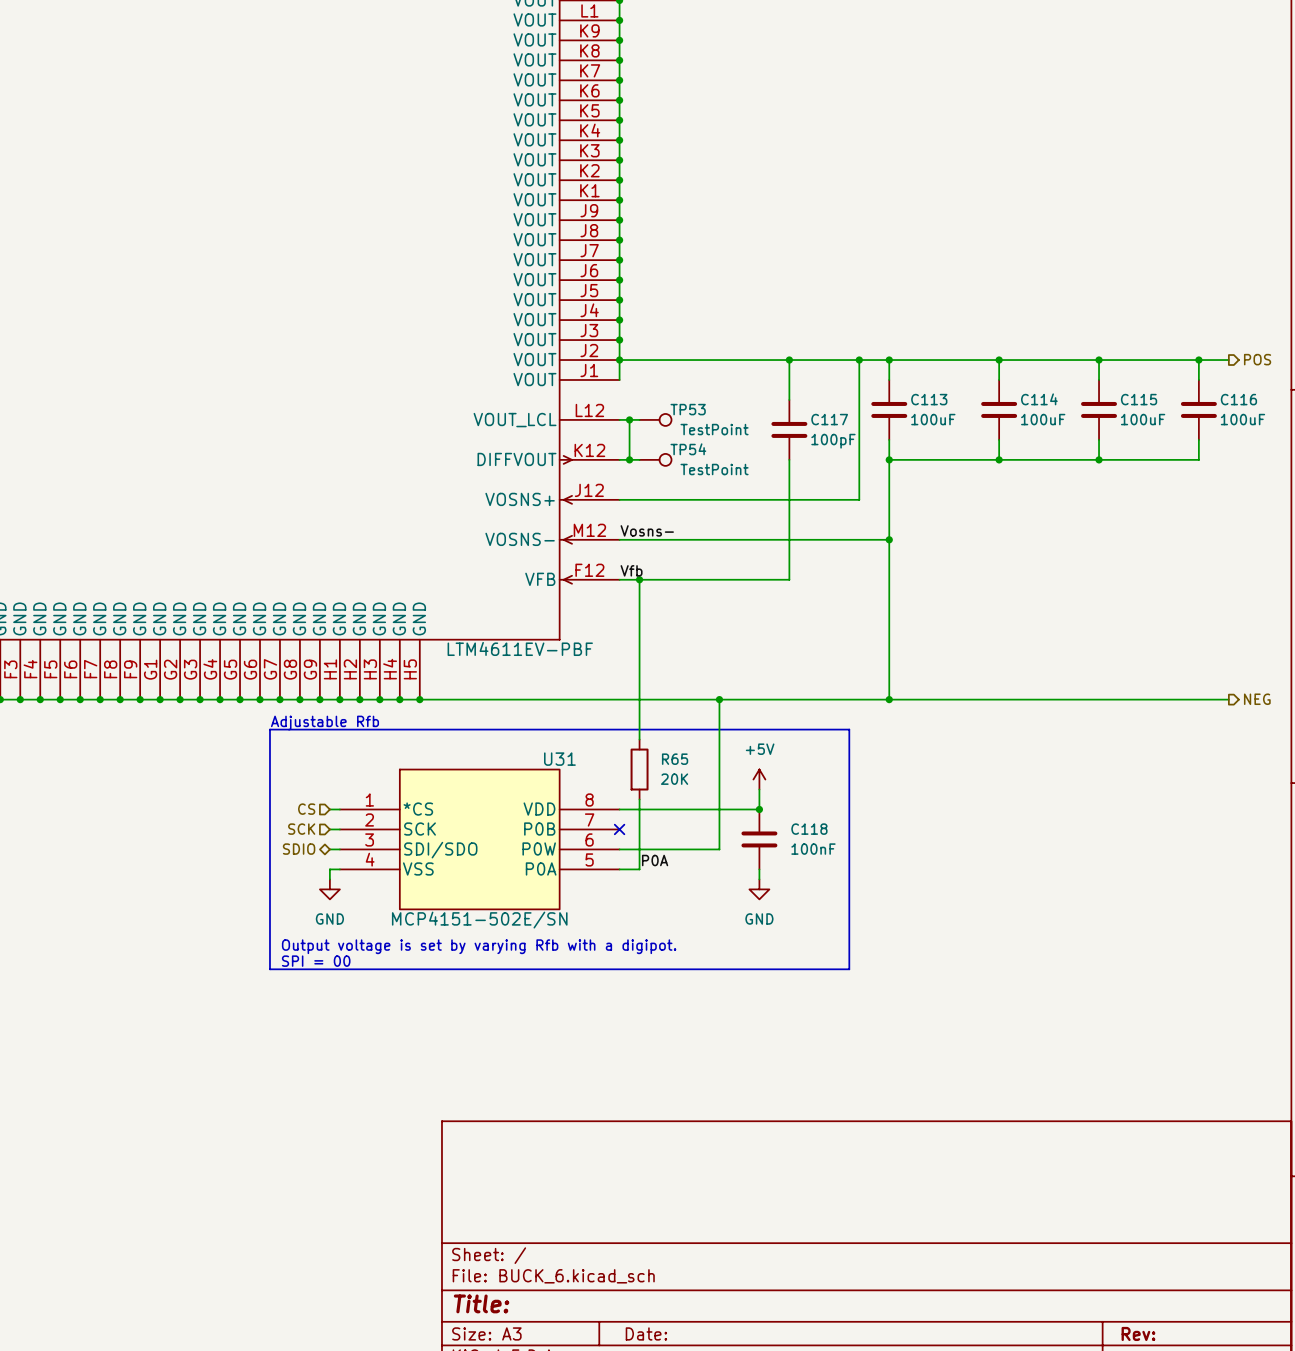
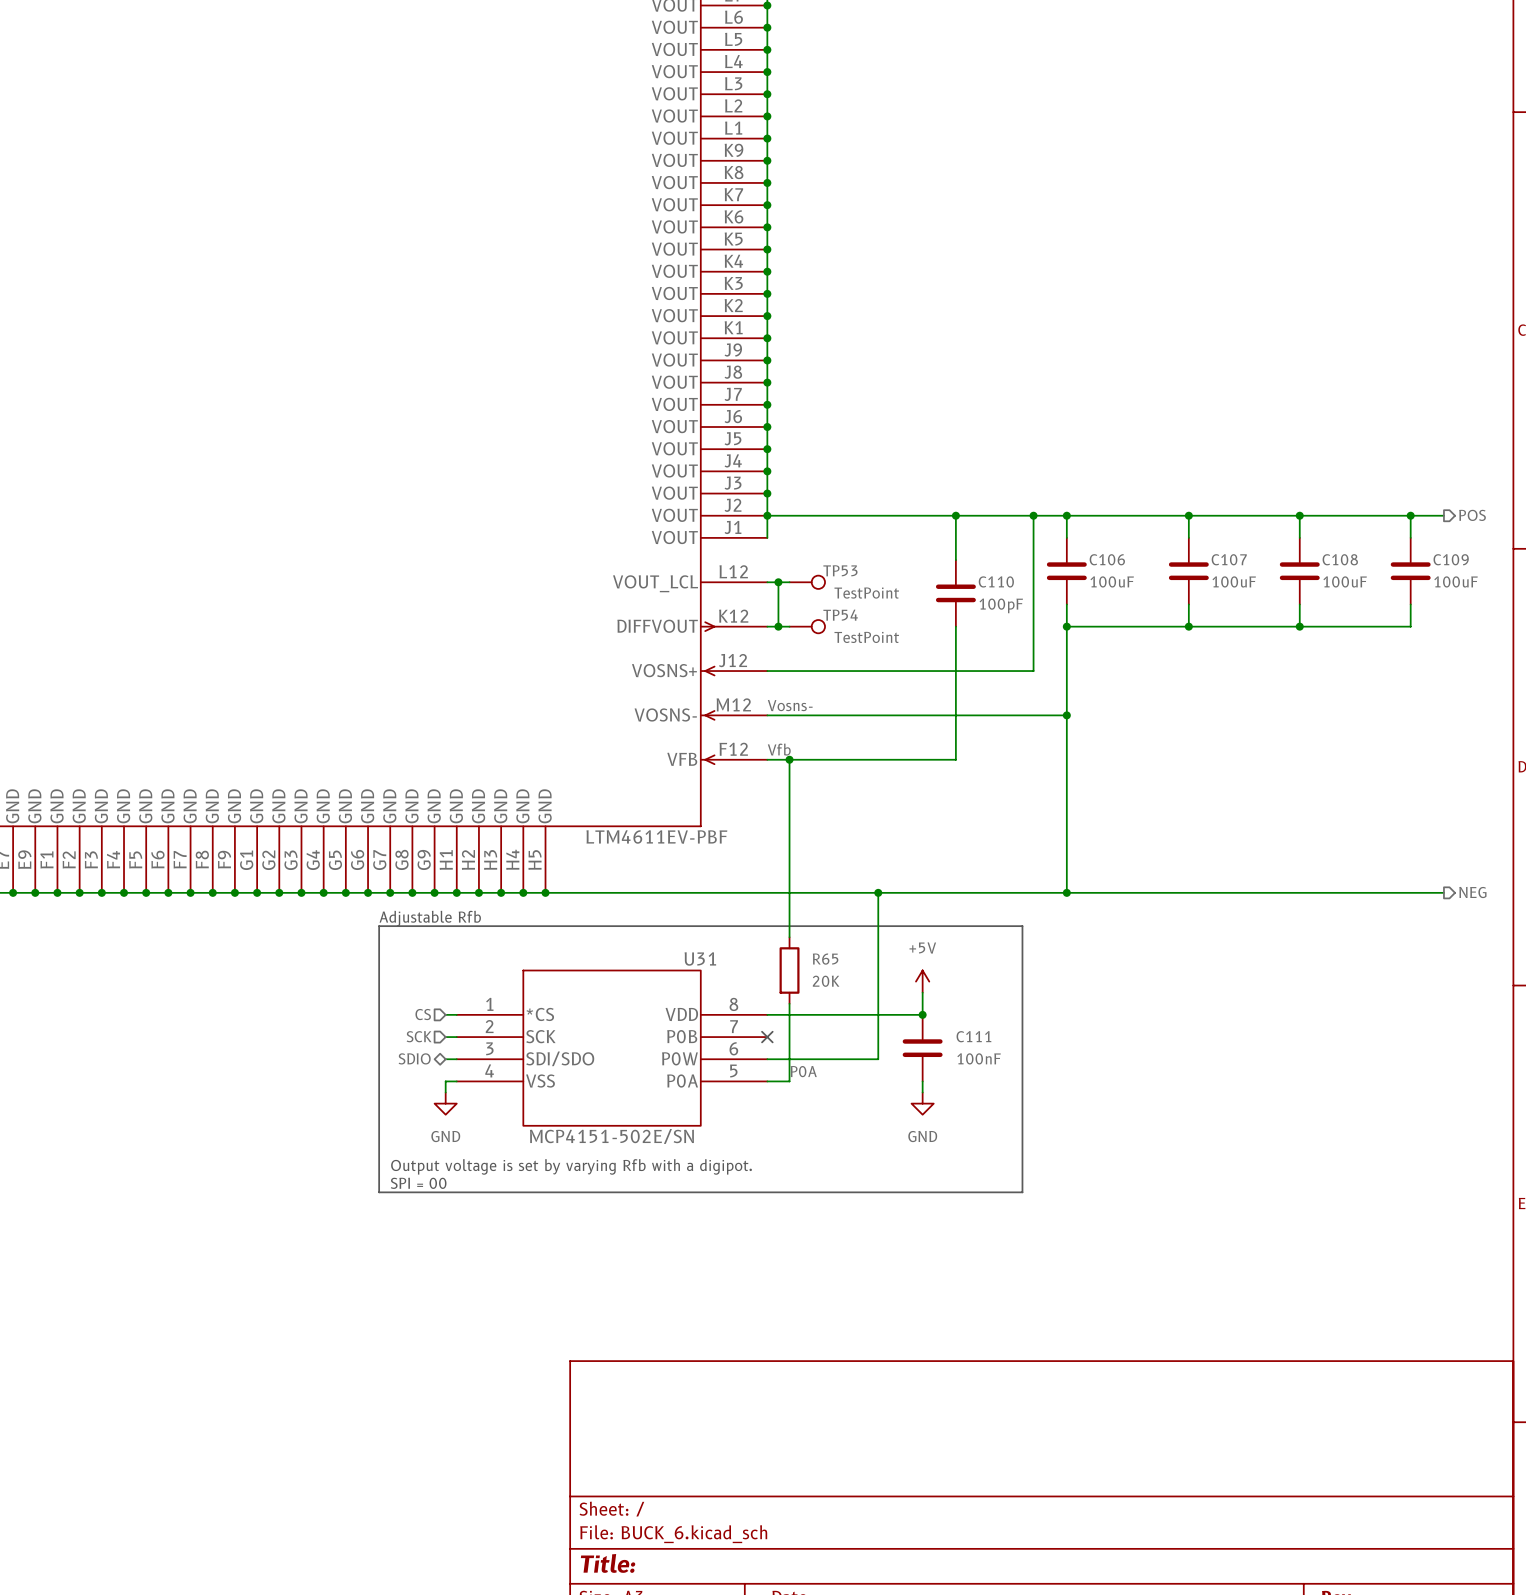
C113 name: C113 (929, 399) -> C106 (1107, 559)
C114 name: C114 (1039, 399) -> C107 (1229, 559)
C115 name: C115 (1139, 399) -> C108 (1340, 559)
C116 name: C116 (1238, 399) -> C109 (1451, 559)
C117 name: C117 (829, 419) -> C110 (996, 581)
C118 name: C118 (809, 829) -> C111 (973, 1036)

